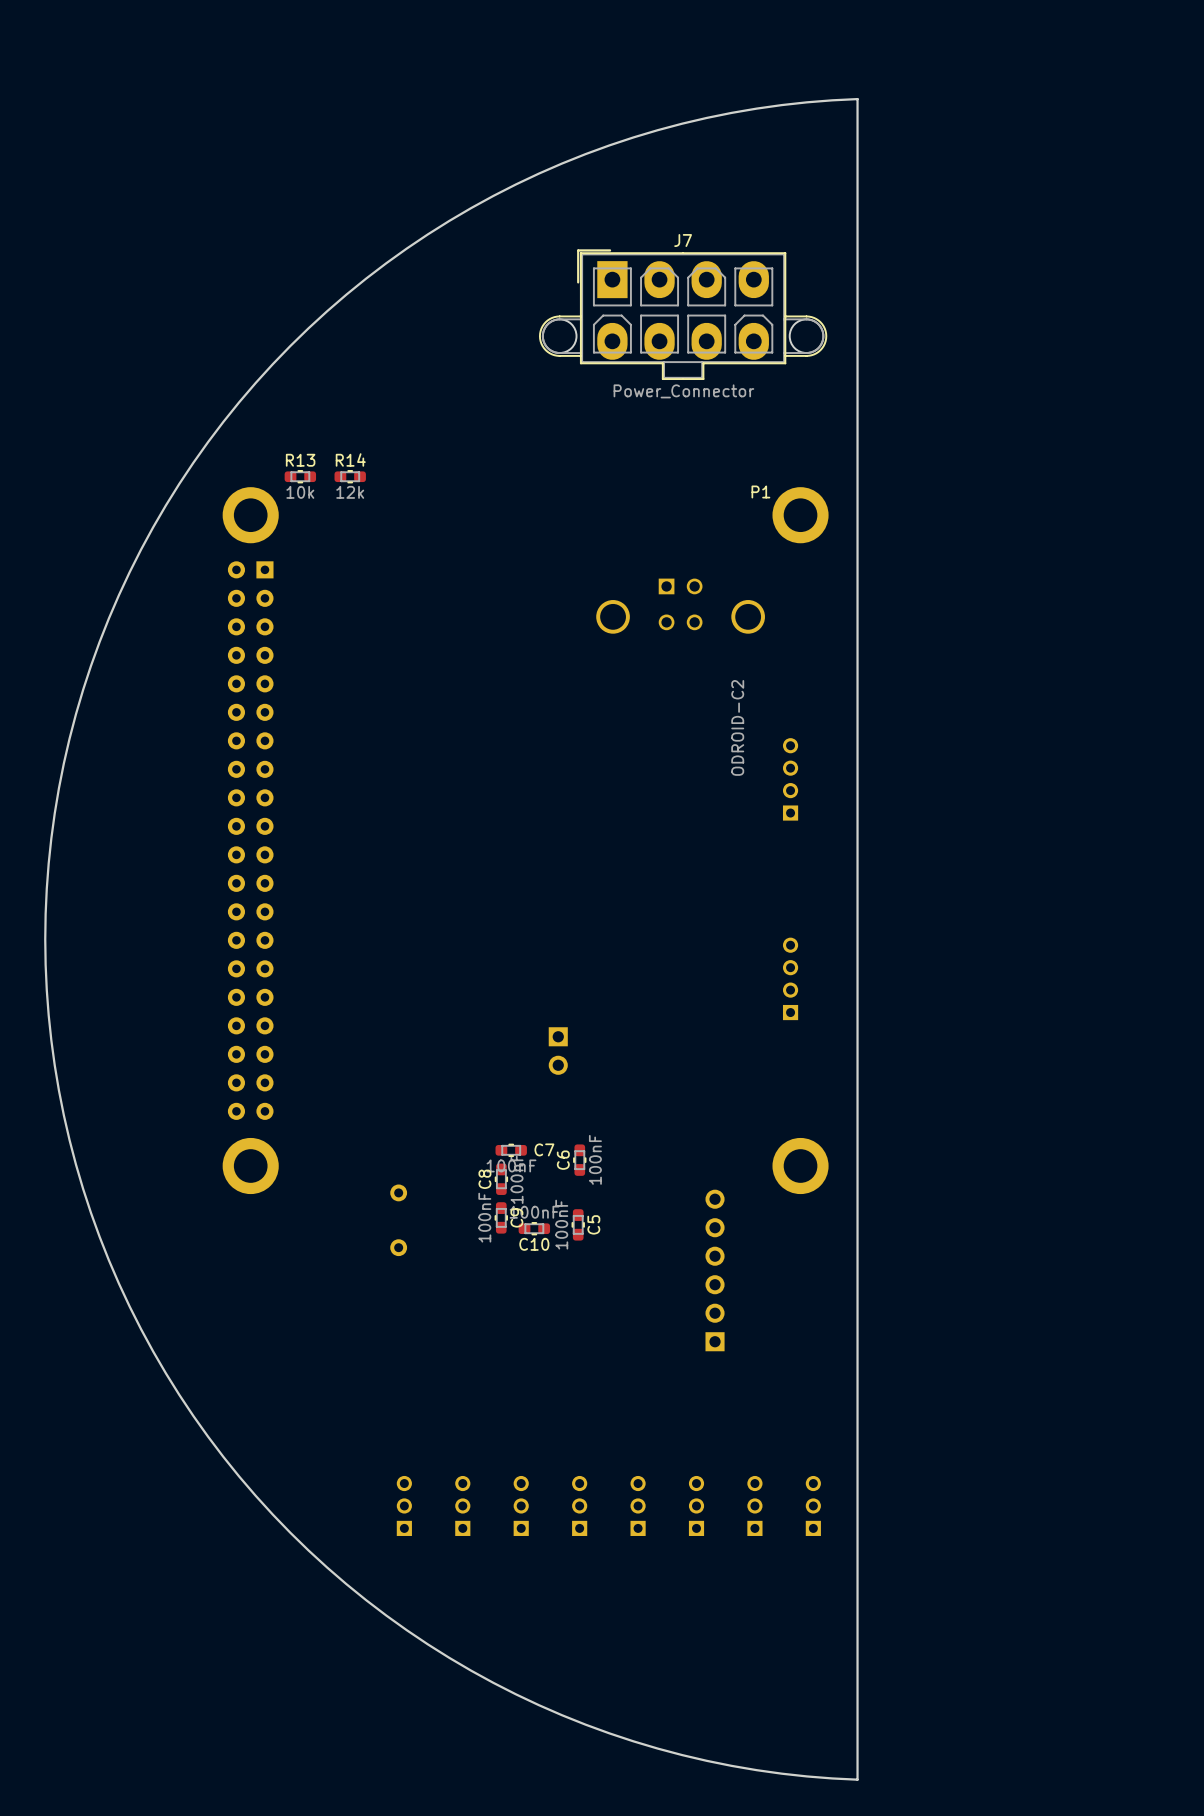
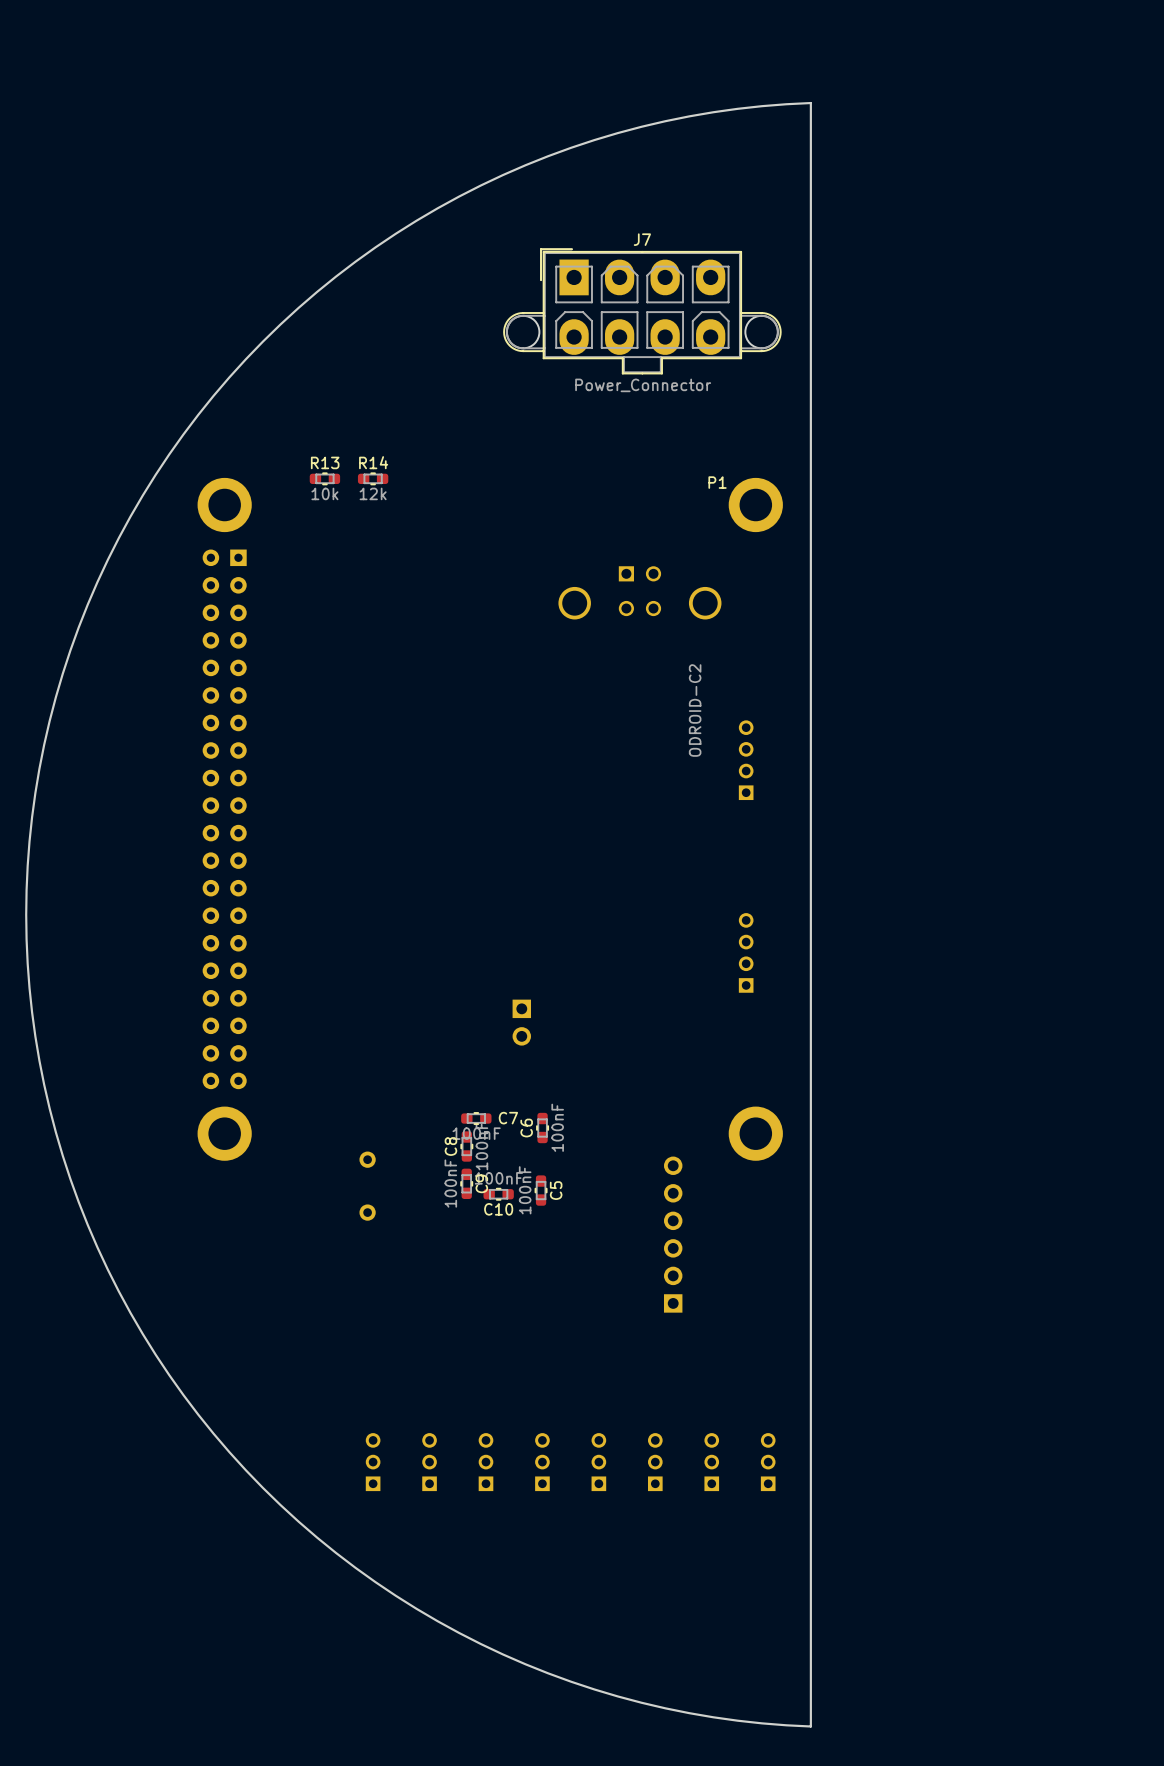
R13 position: (300, 476) -> (324, 478)
R14 position: (350, 476) -> (373, 478)

